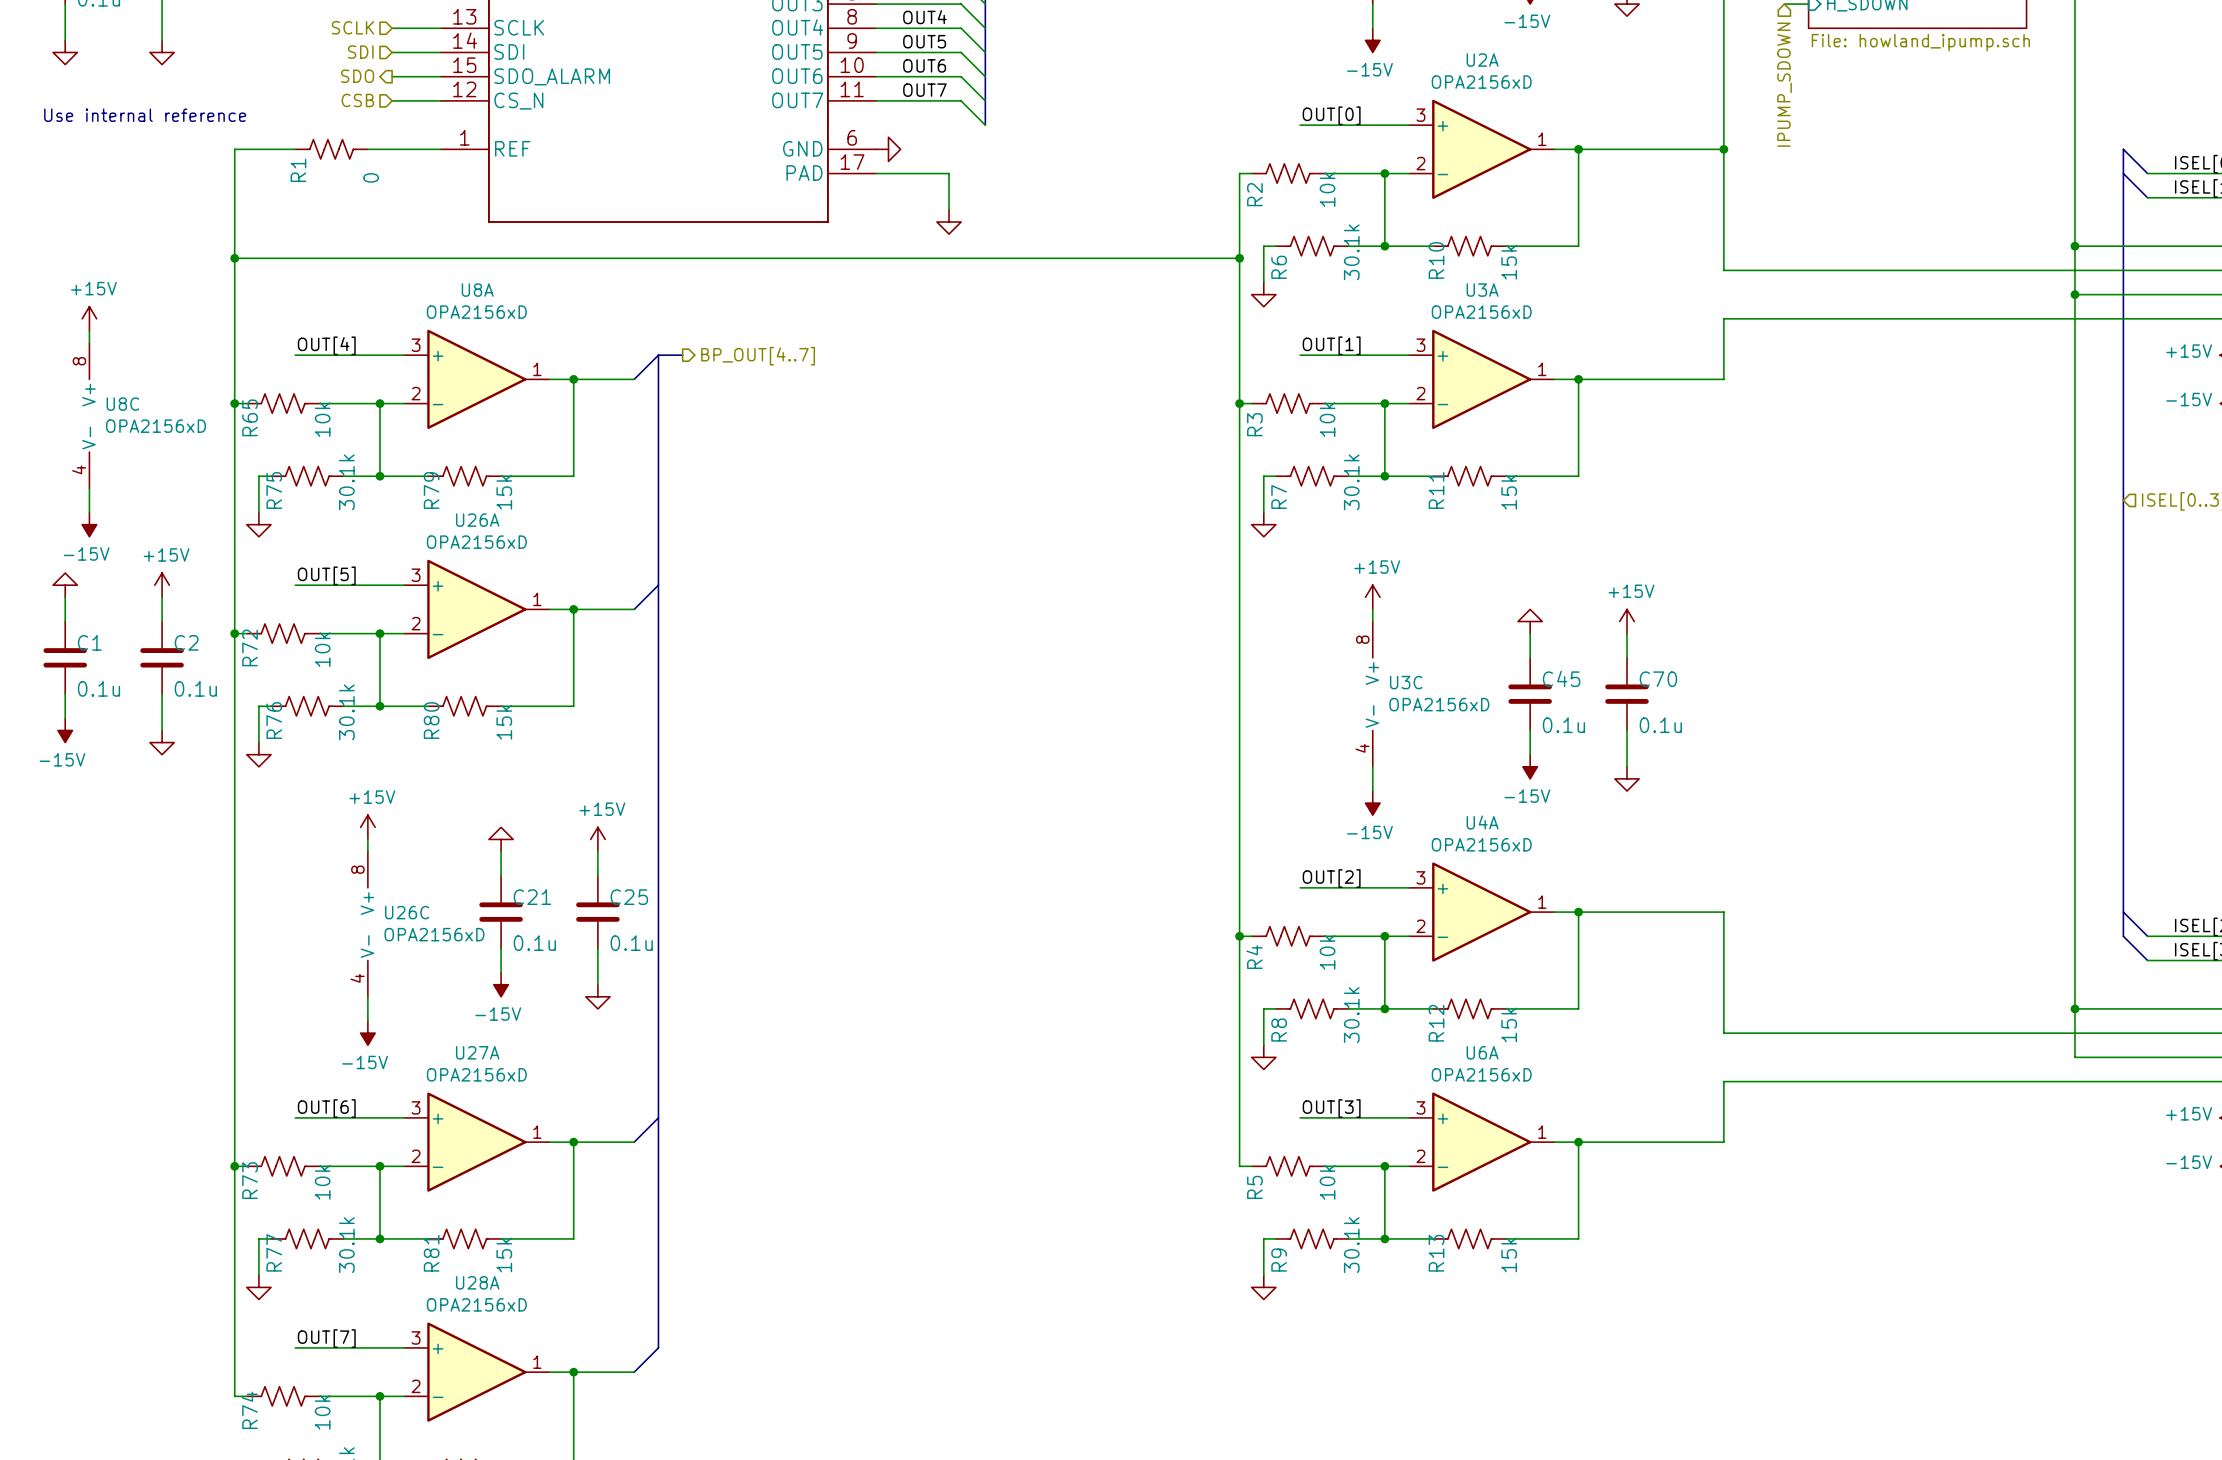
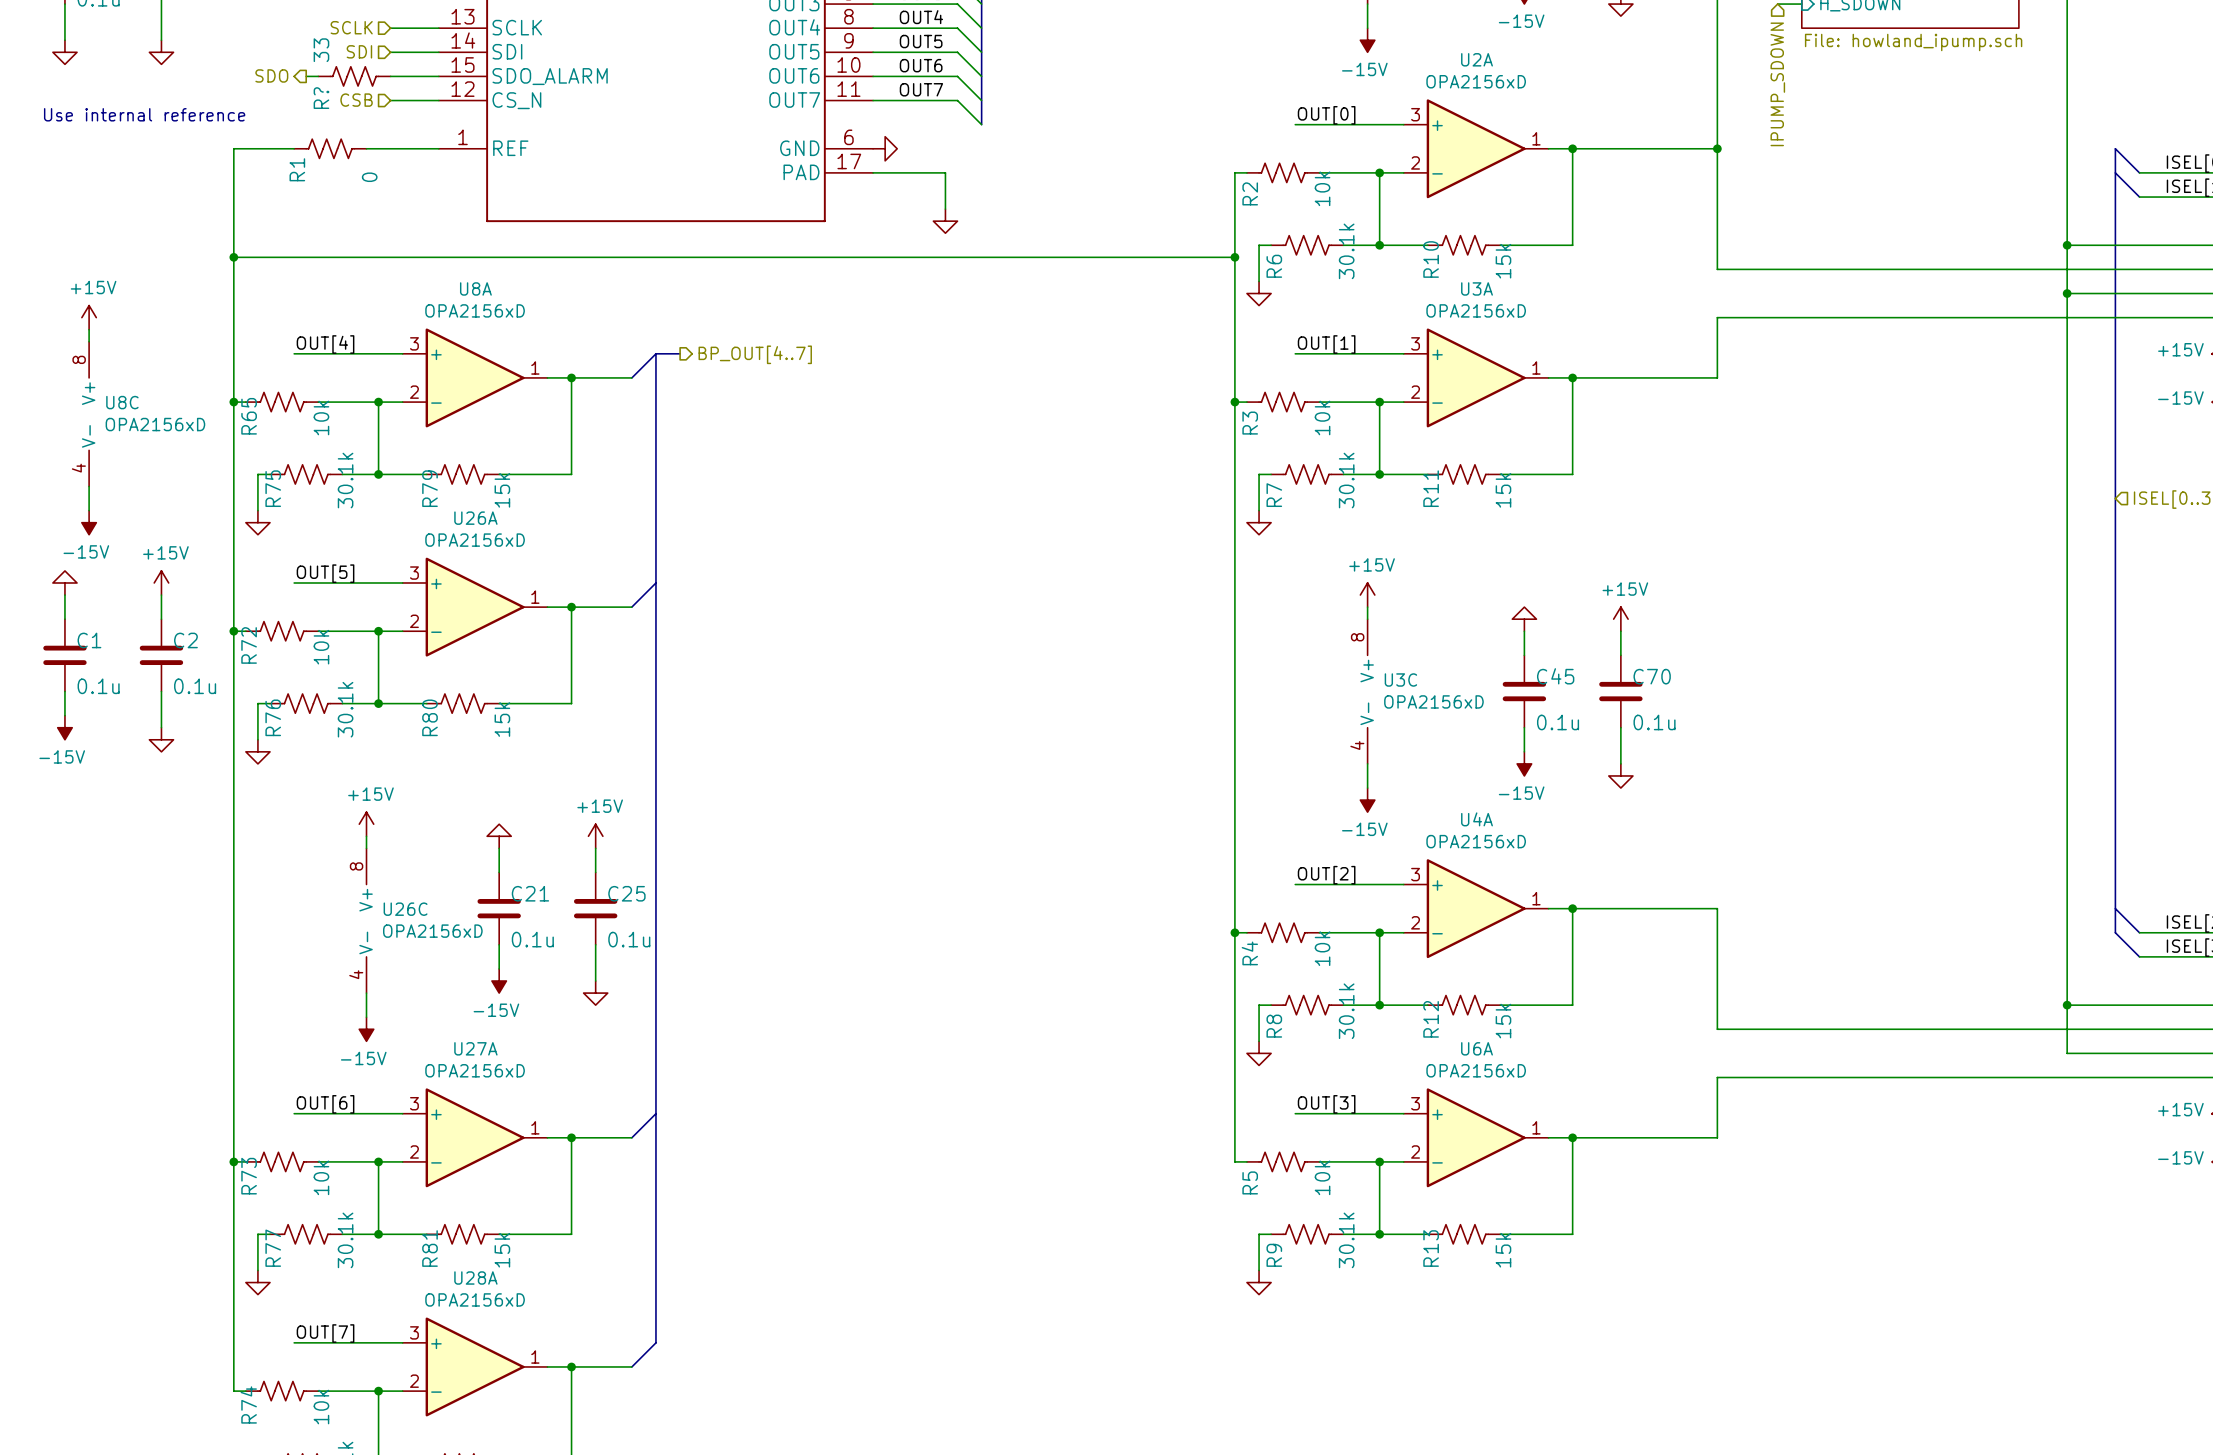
wire: none -> (306, 76) (318, 76)
R?: none -> 33 (354, 76)
hierarchical label position: SDO (357, 76) -> SDO (271, 75)

